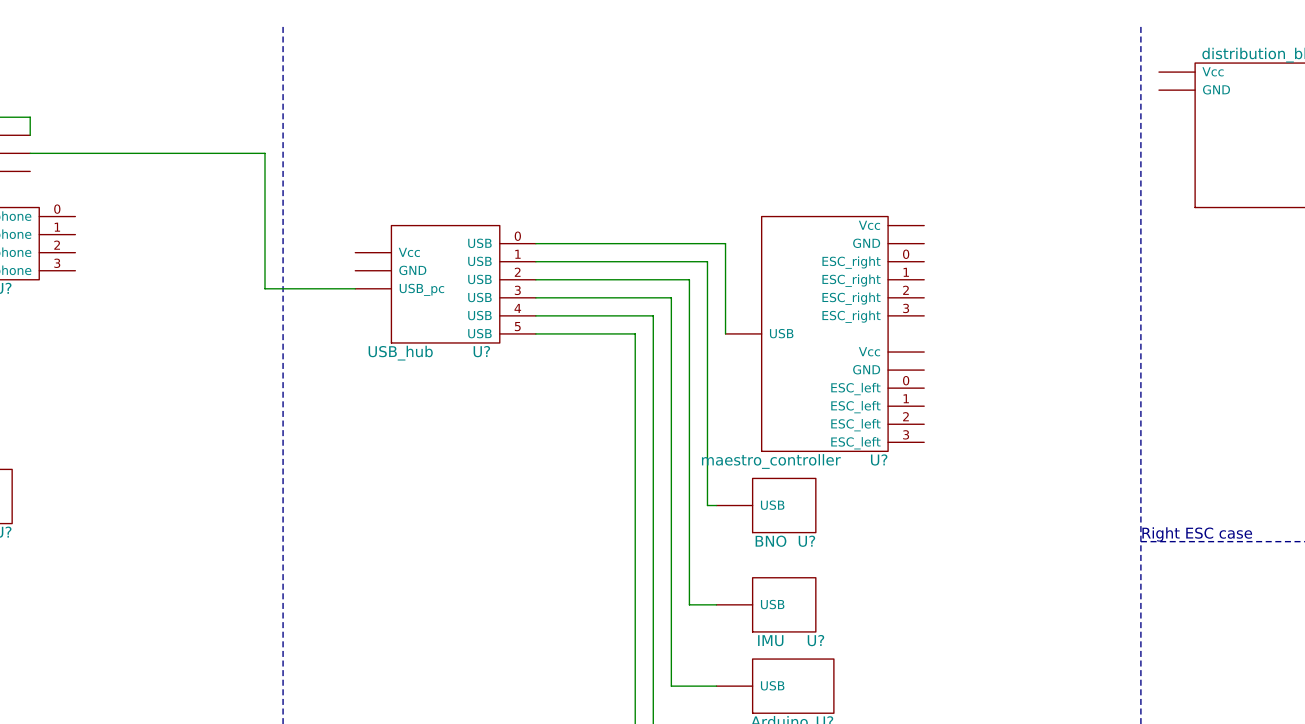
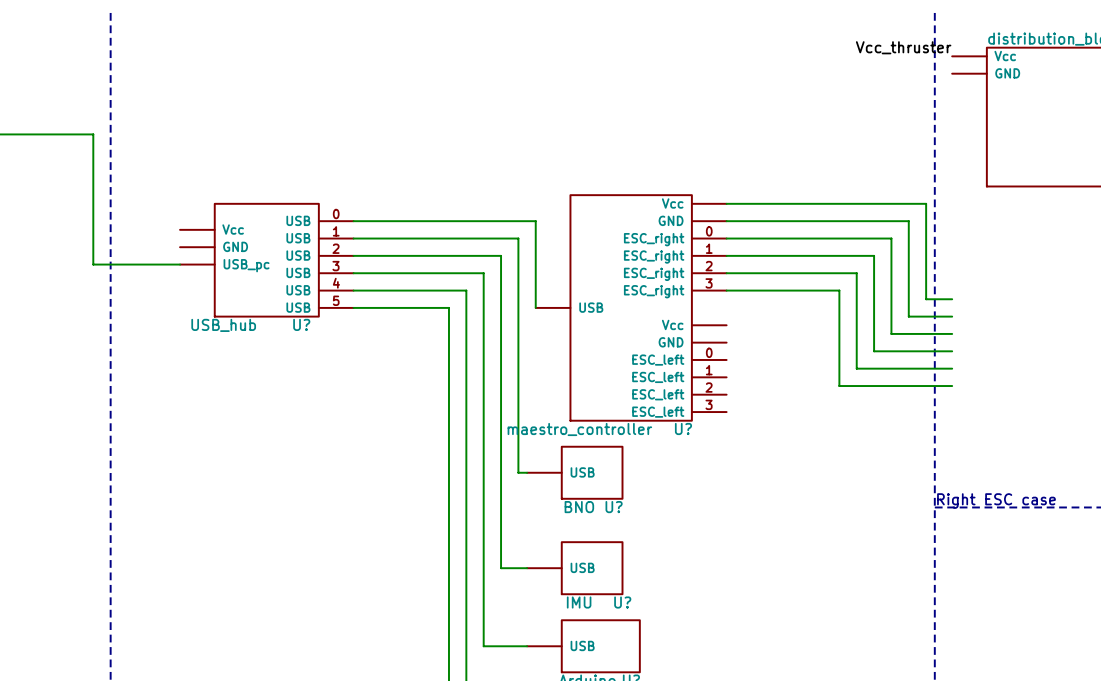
label: none -> Vcc_thruster (903, 47)
wire: none -> (726, 203) (926, 203) (926, 299) (952, 299)
wire: none -> (726, 221) (908, 221) (908, 316) (952, 316)
wire: none -> (726, 238) (891, 238) (891, 333) (952, 333)
wire: none -> (726, 255) (874, 255) (874, 351) (952, 351)
wire: none -> (726, 273) (856, 273) (856, 368) (952, 368)
wire: none -> (726, 290) (839, 290) (839, 386) (952, 386)

